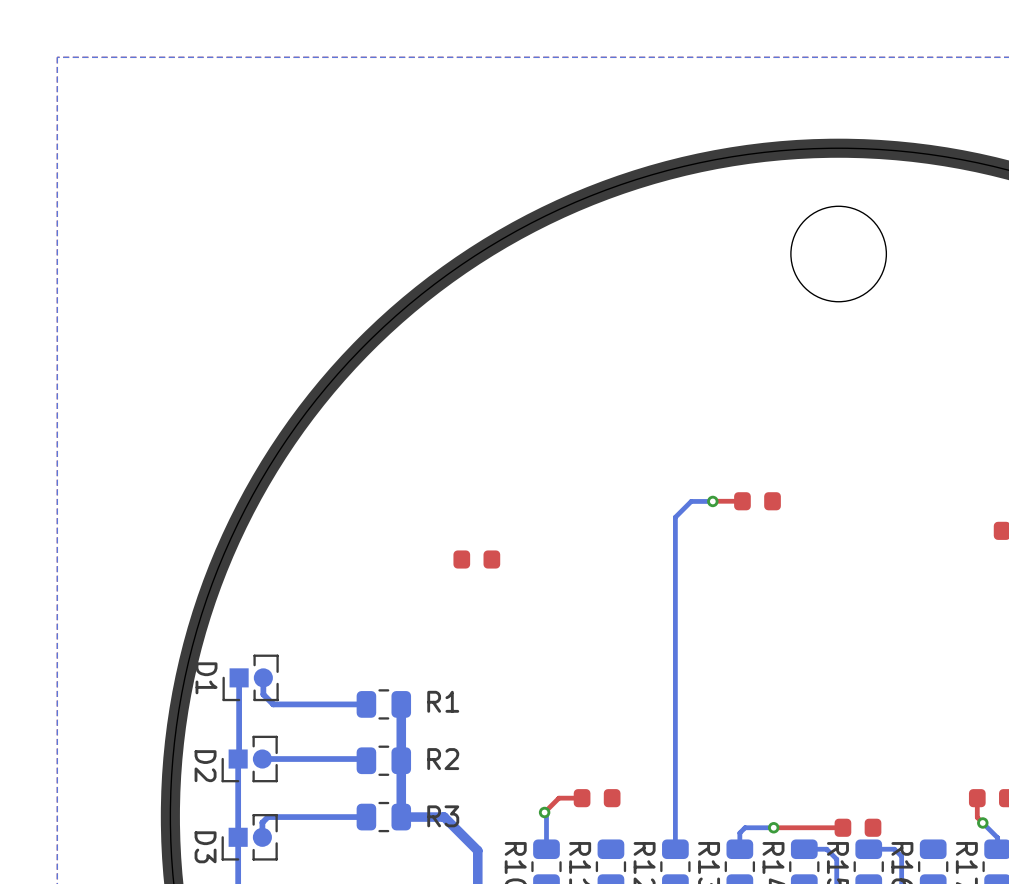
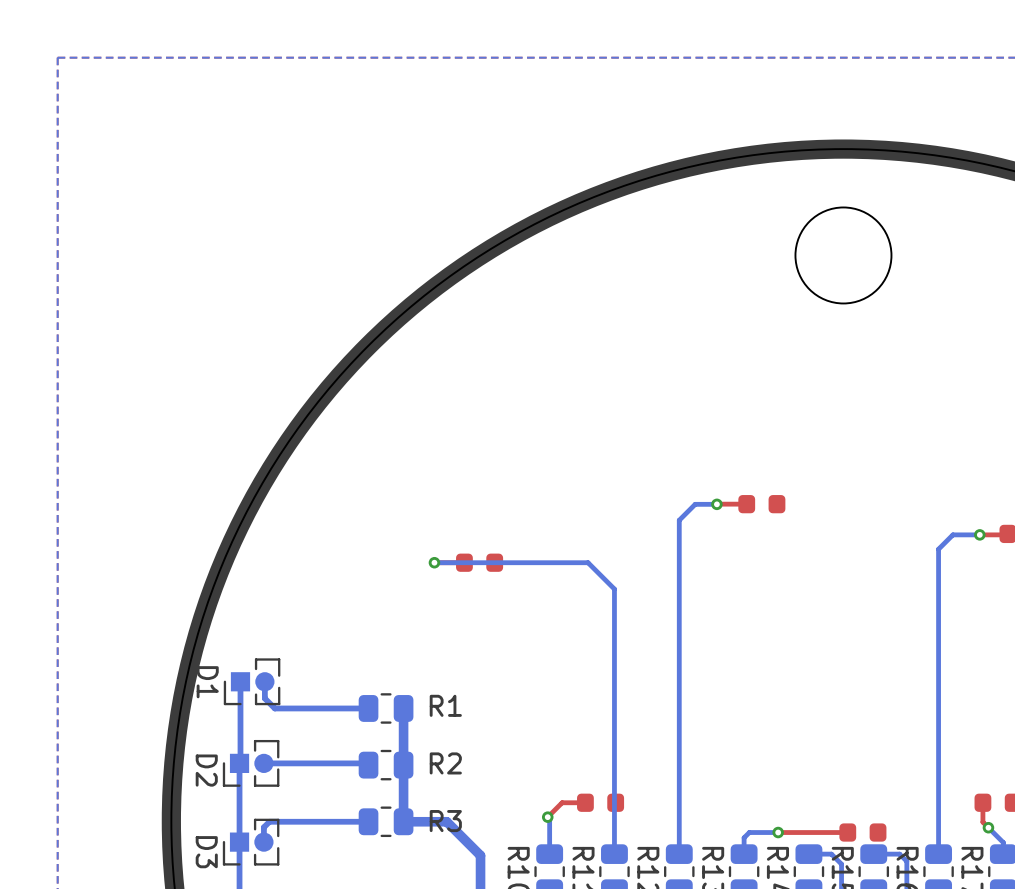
top track: none -> (1007, 533) (979, 534)
bottom track: none -> (979, 534) (952, 534) (938, 549) (938, 854)
via: none -> (979, 534)
bottom track: none -> (434, 562) (588, 562) (614, 589) (614, 854)
via: none -> (434, 562)

